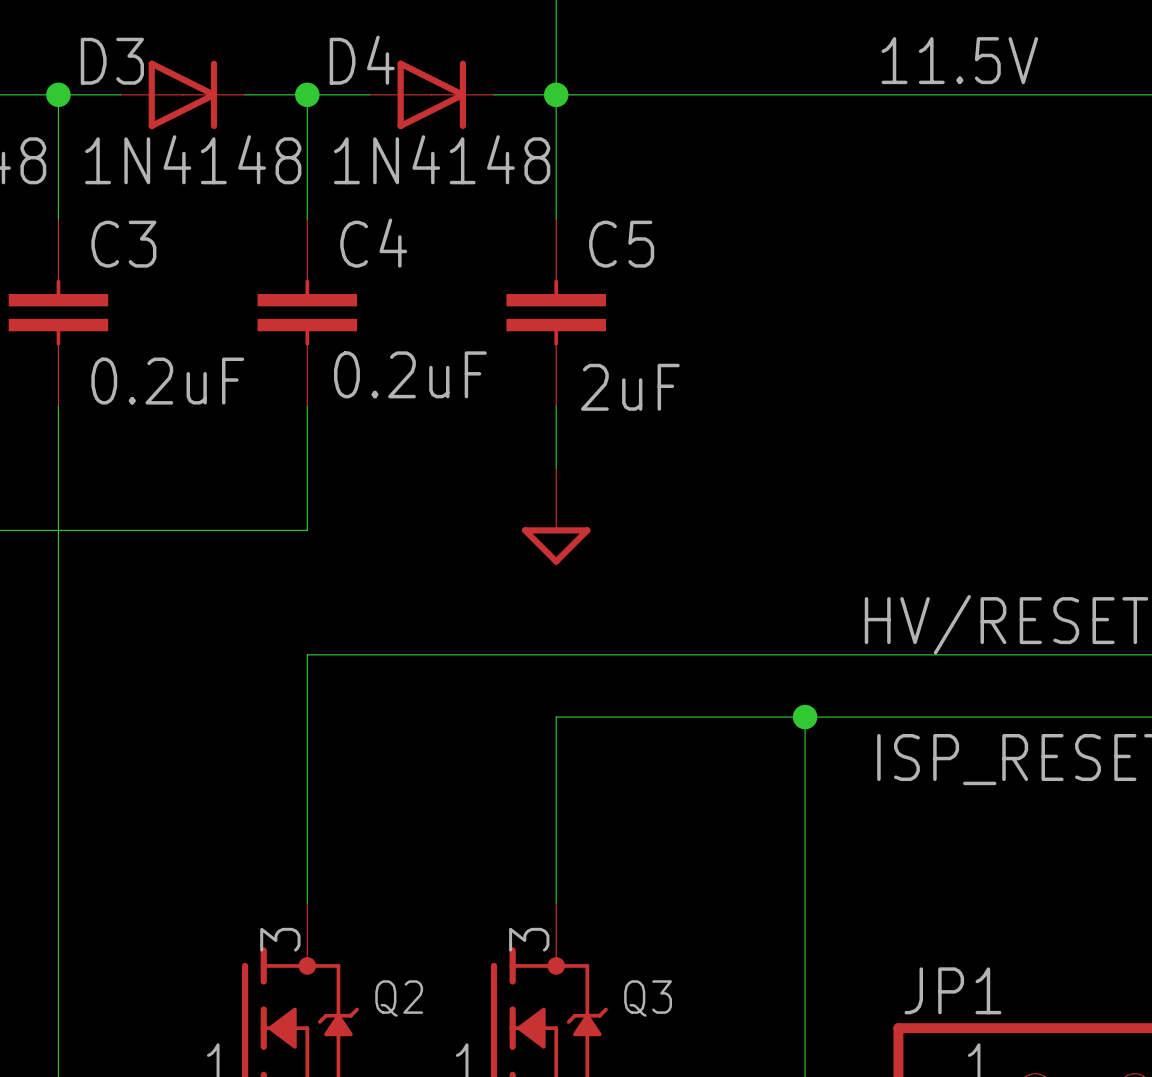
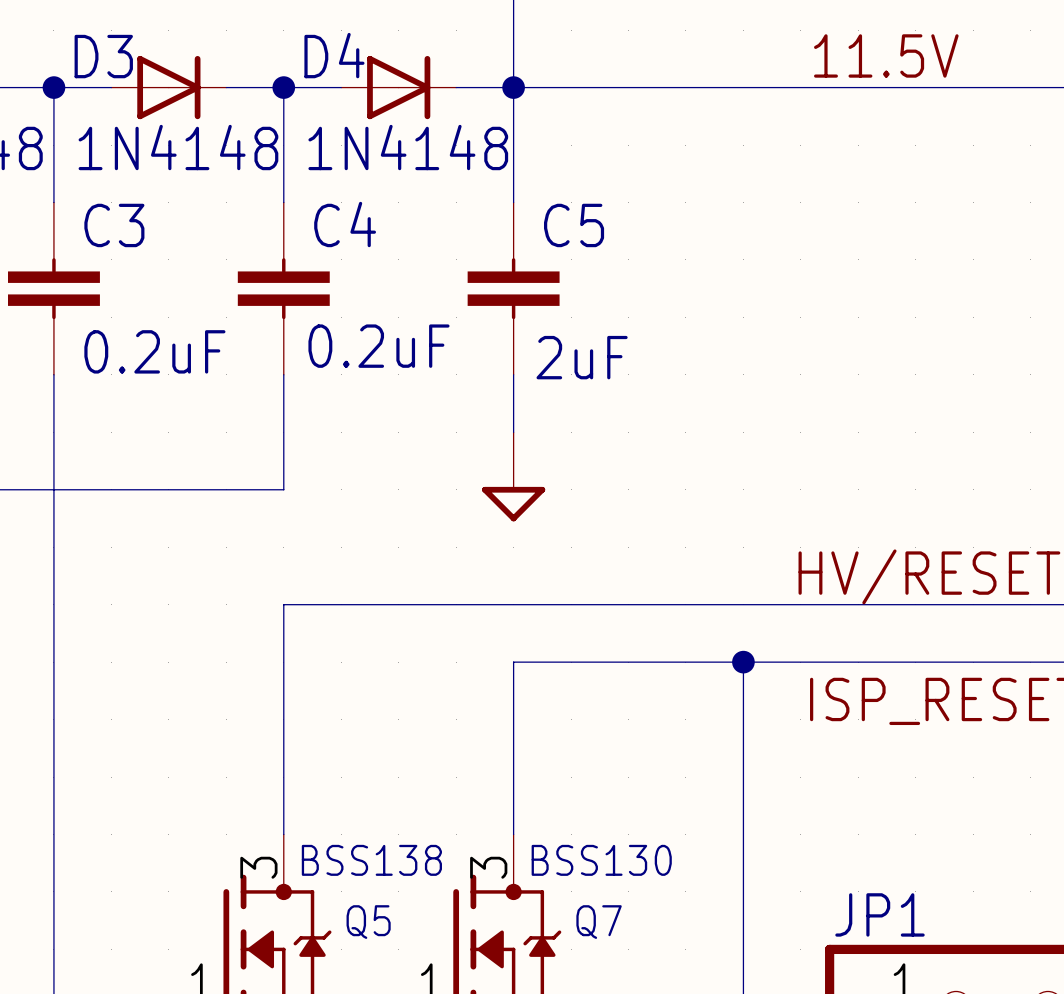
Q2 value: none -> BSS138 (371, 860)
Q3 value: none -> BSS130 (601, 860)
Q2 name: Q2 (399, 998) -> Q5 (368, 922)
Q3 name: Q3 (648, 998) -> Q7 (599, 922)

